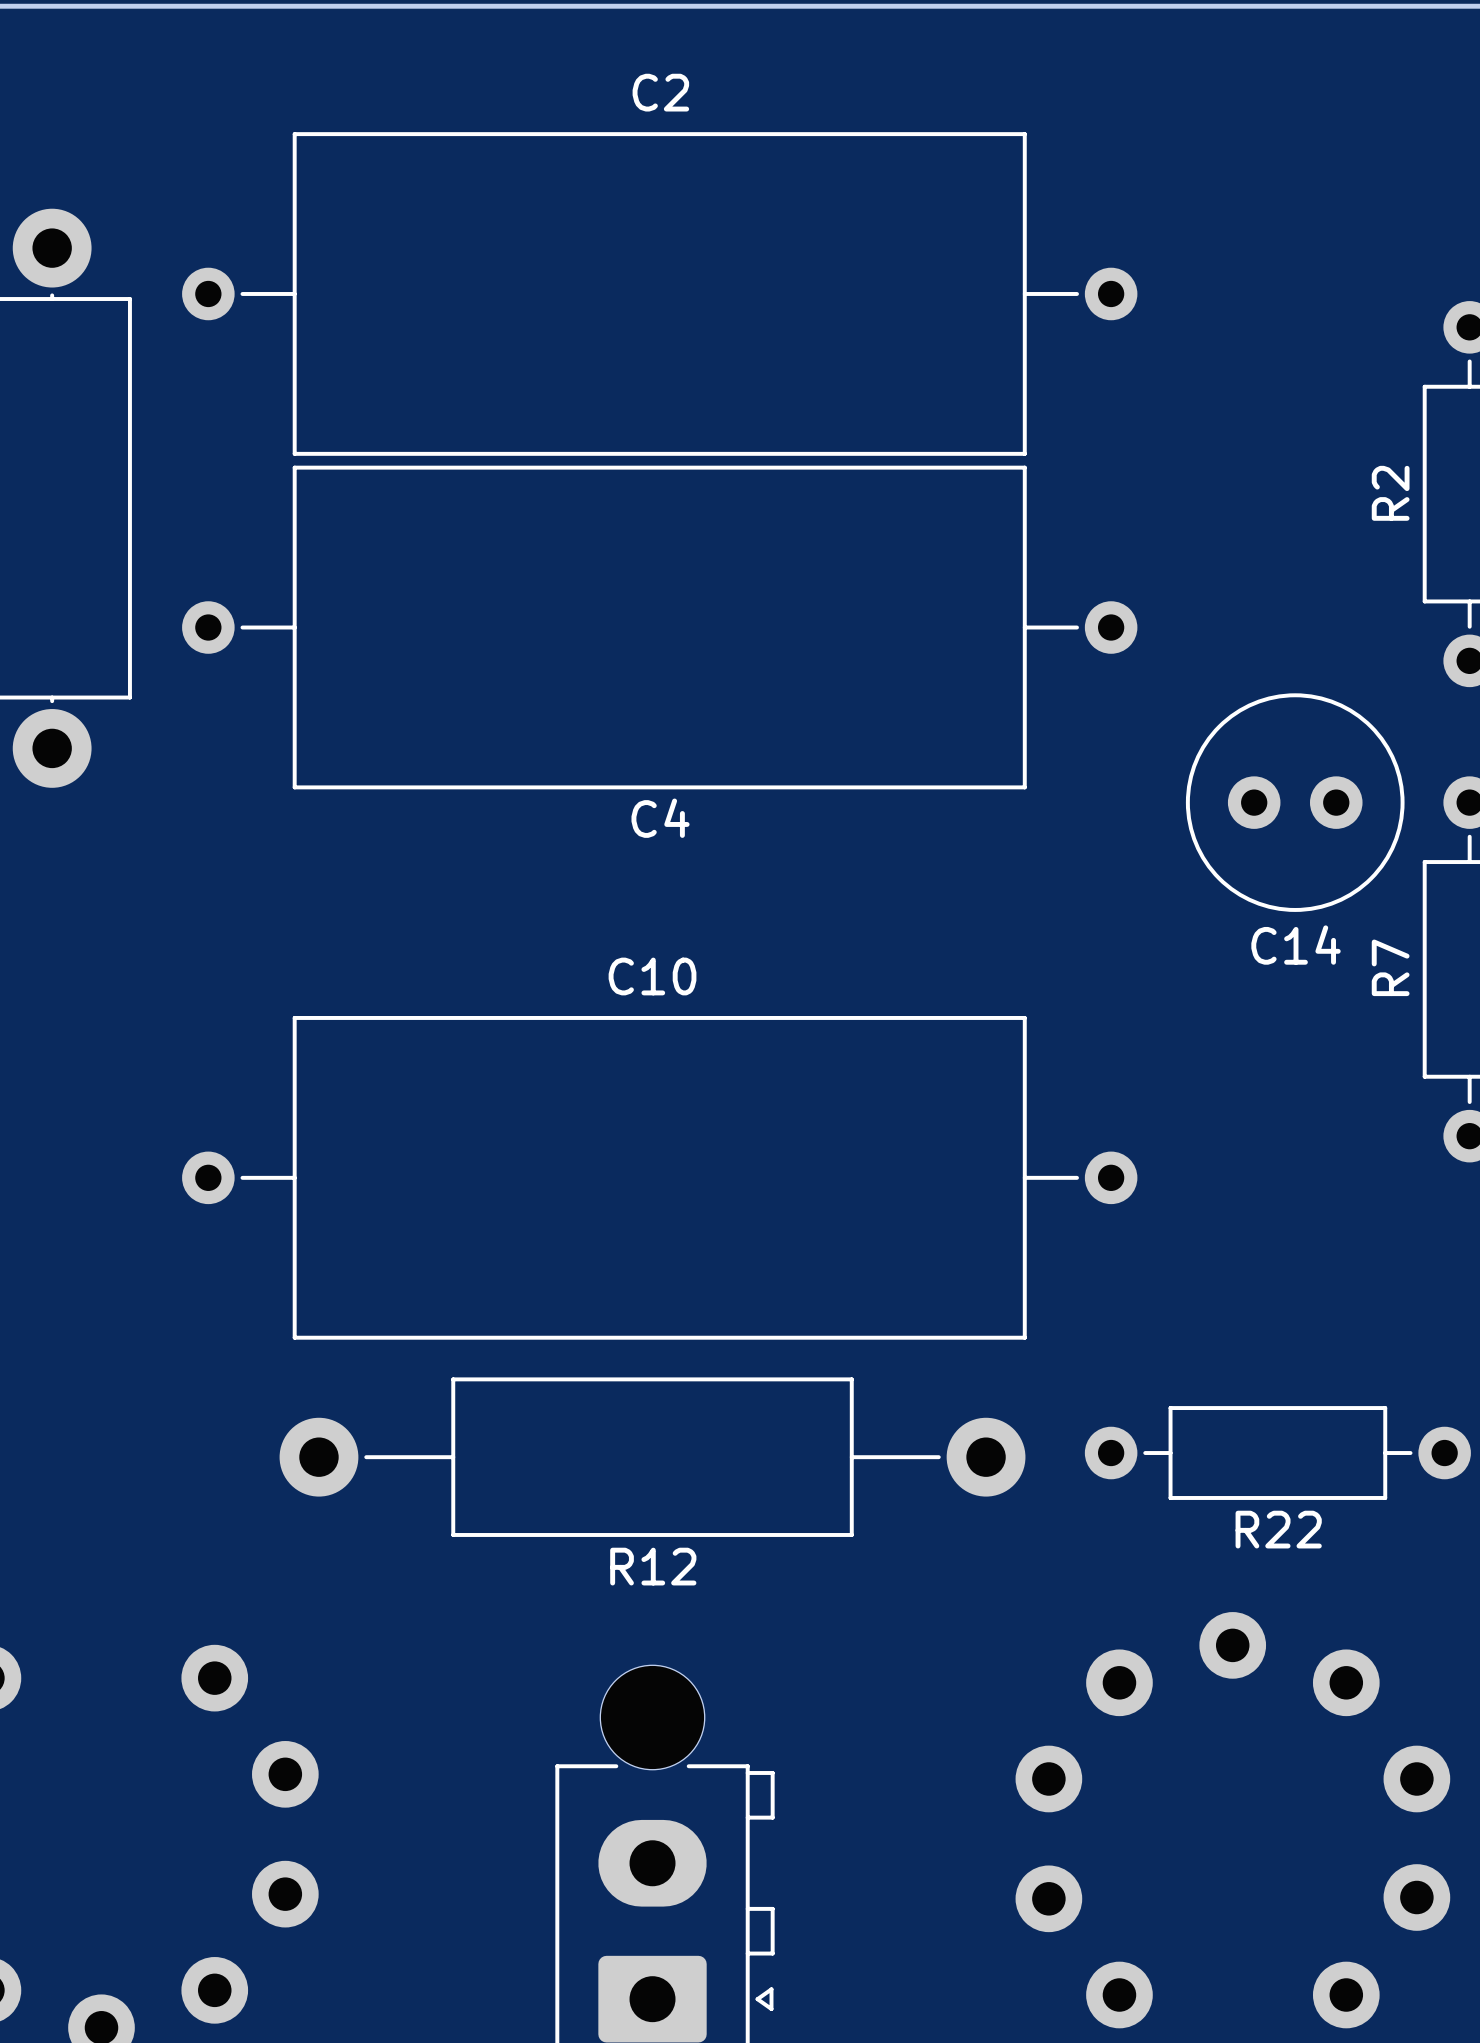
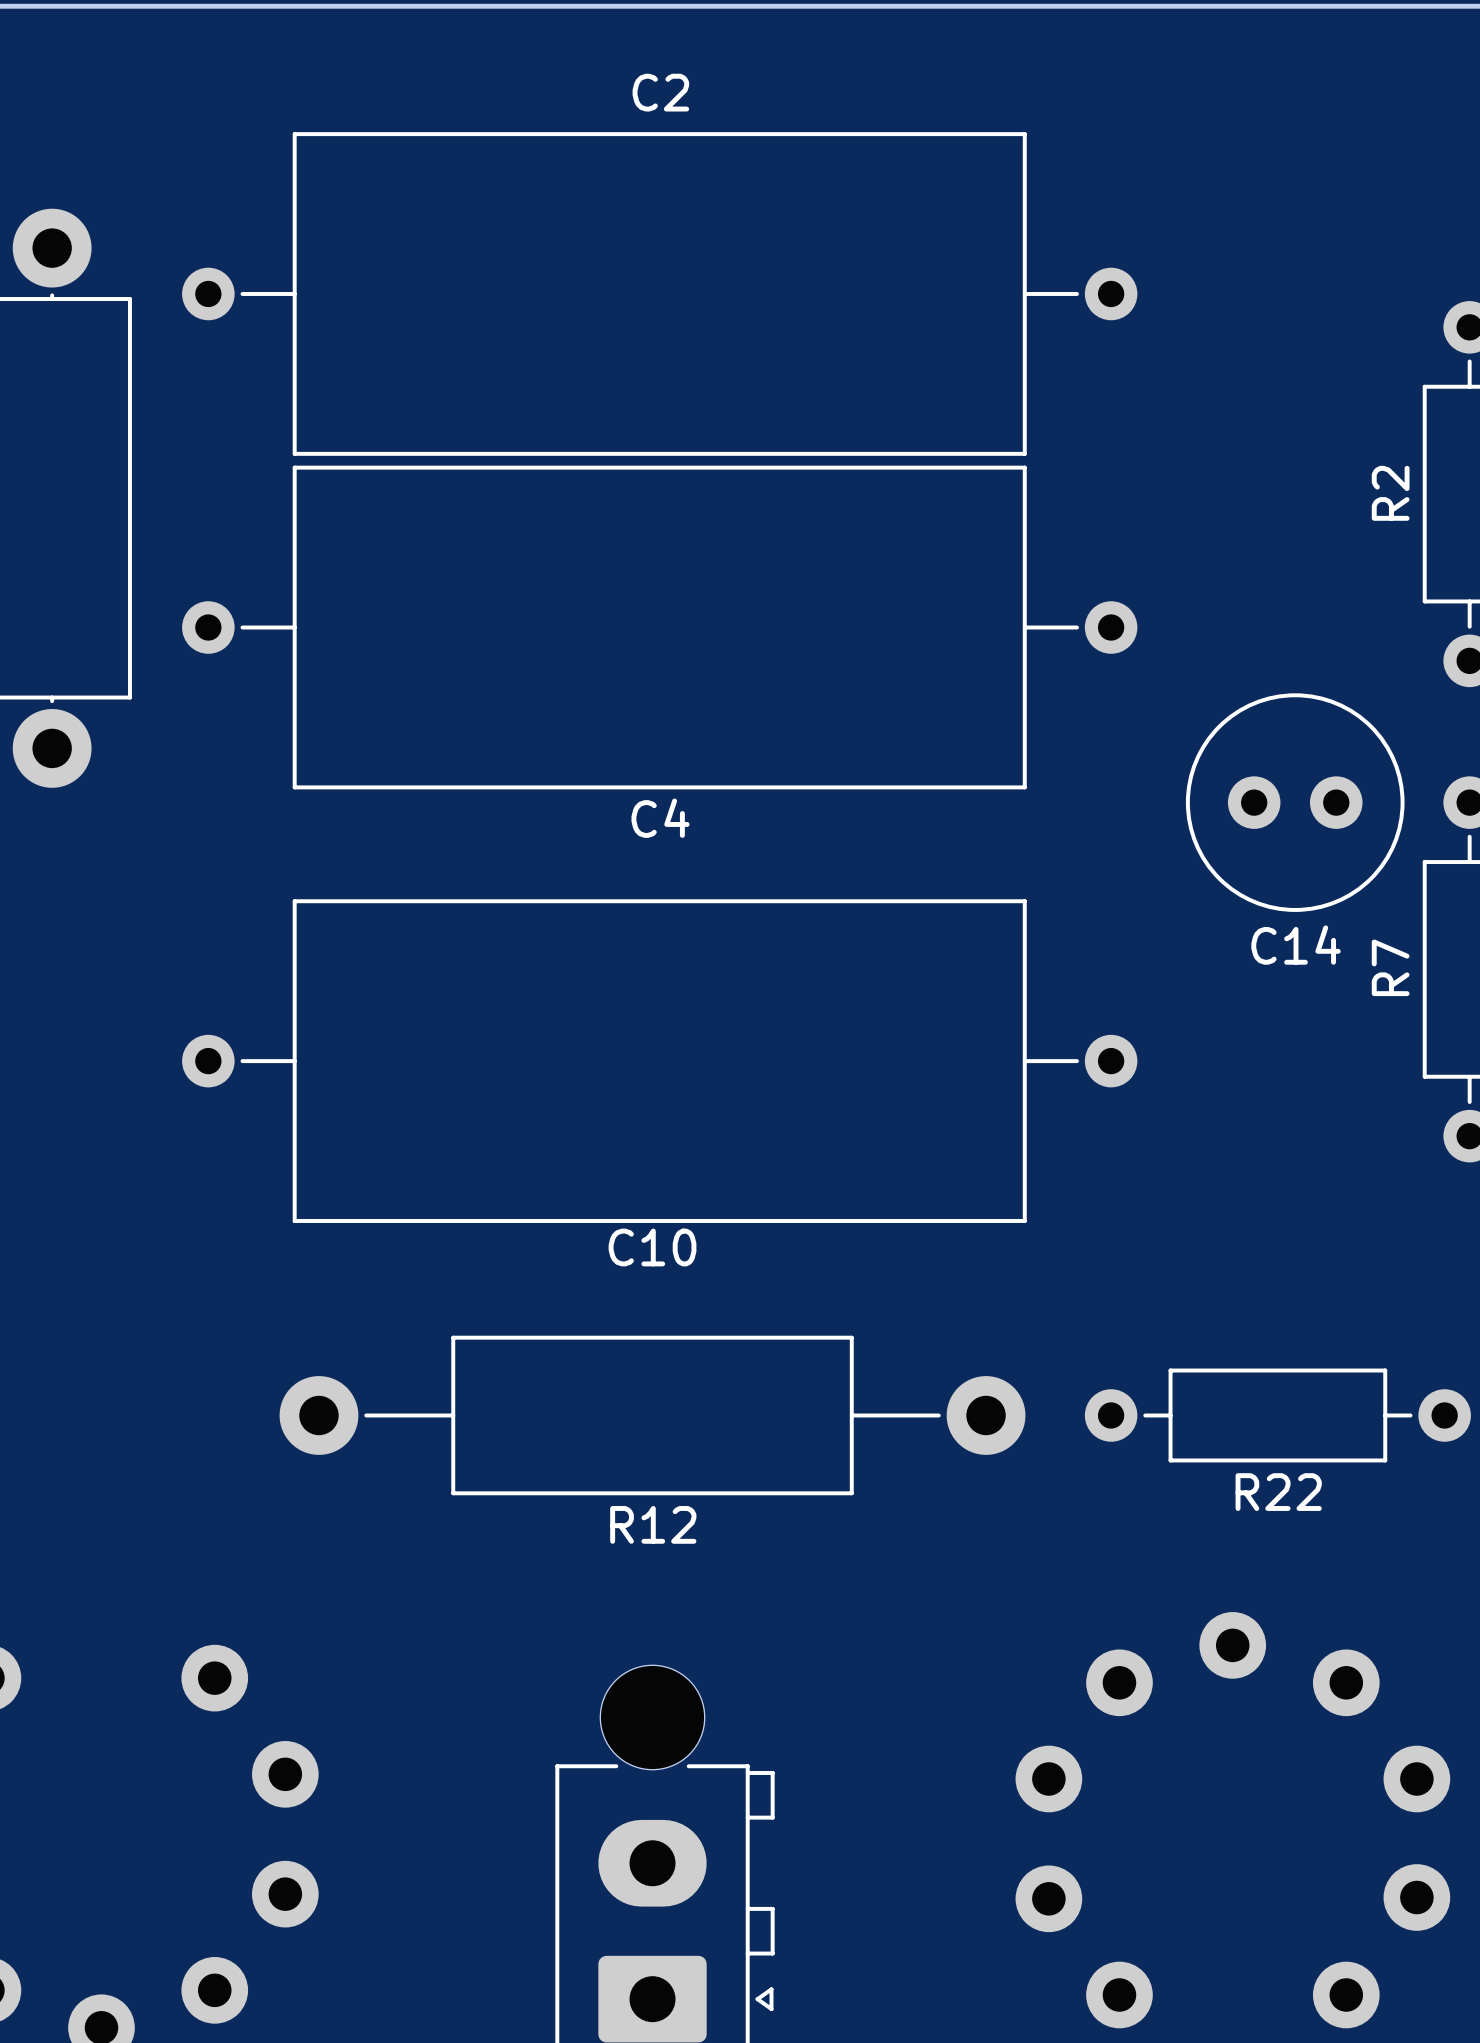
C10 name position: C10 (652, 976) -> C10 (652, 1247)
C10 position: (659, 1177) -> (659, 1061)
R22 position: (1277, 1453) -> (1277, 1415)
R12 position: (652, 1457) -> (652, 1415)

